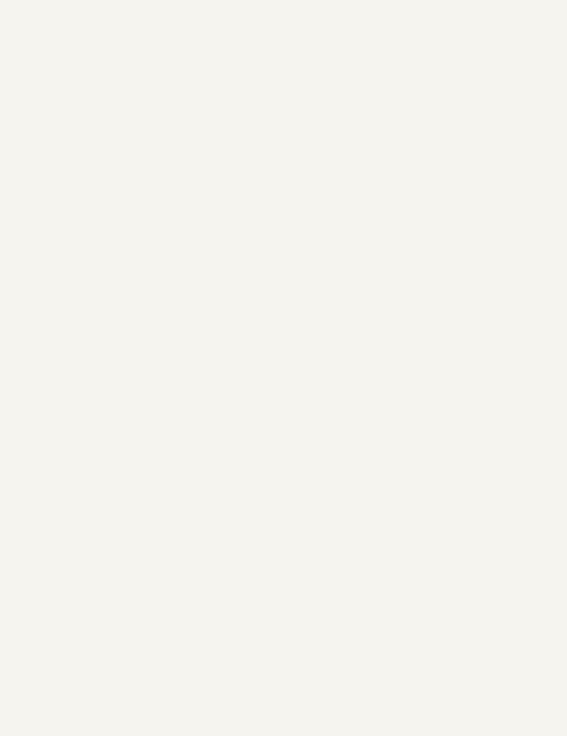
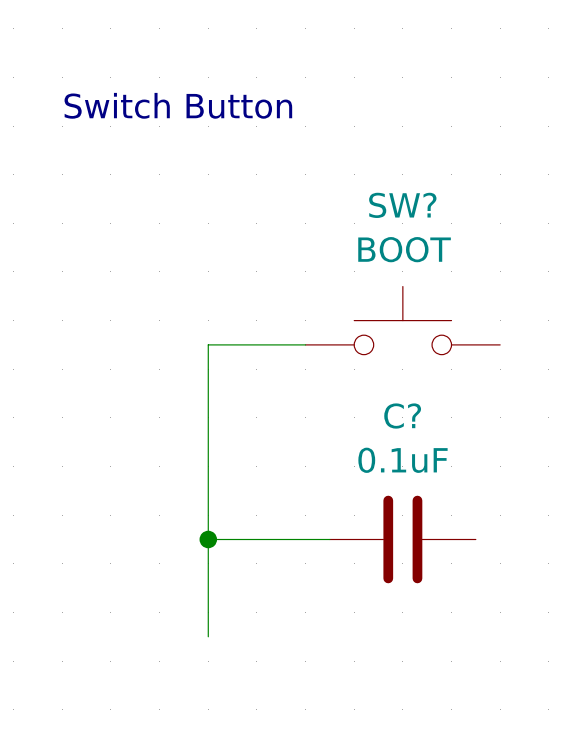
text: none -> Switch Button (178, 105)
SW?: none -> BOOT (402, 320)
wire: none -> (305, 344) (208, 344) (208, 636)
wire: none -> (208, 539) (329, 539)
junction: none -> (208, 539)
C?: none -> 0.1uF (402, 539)

